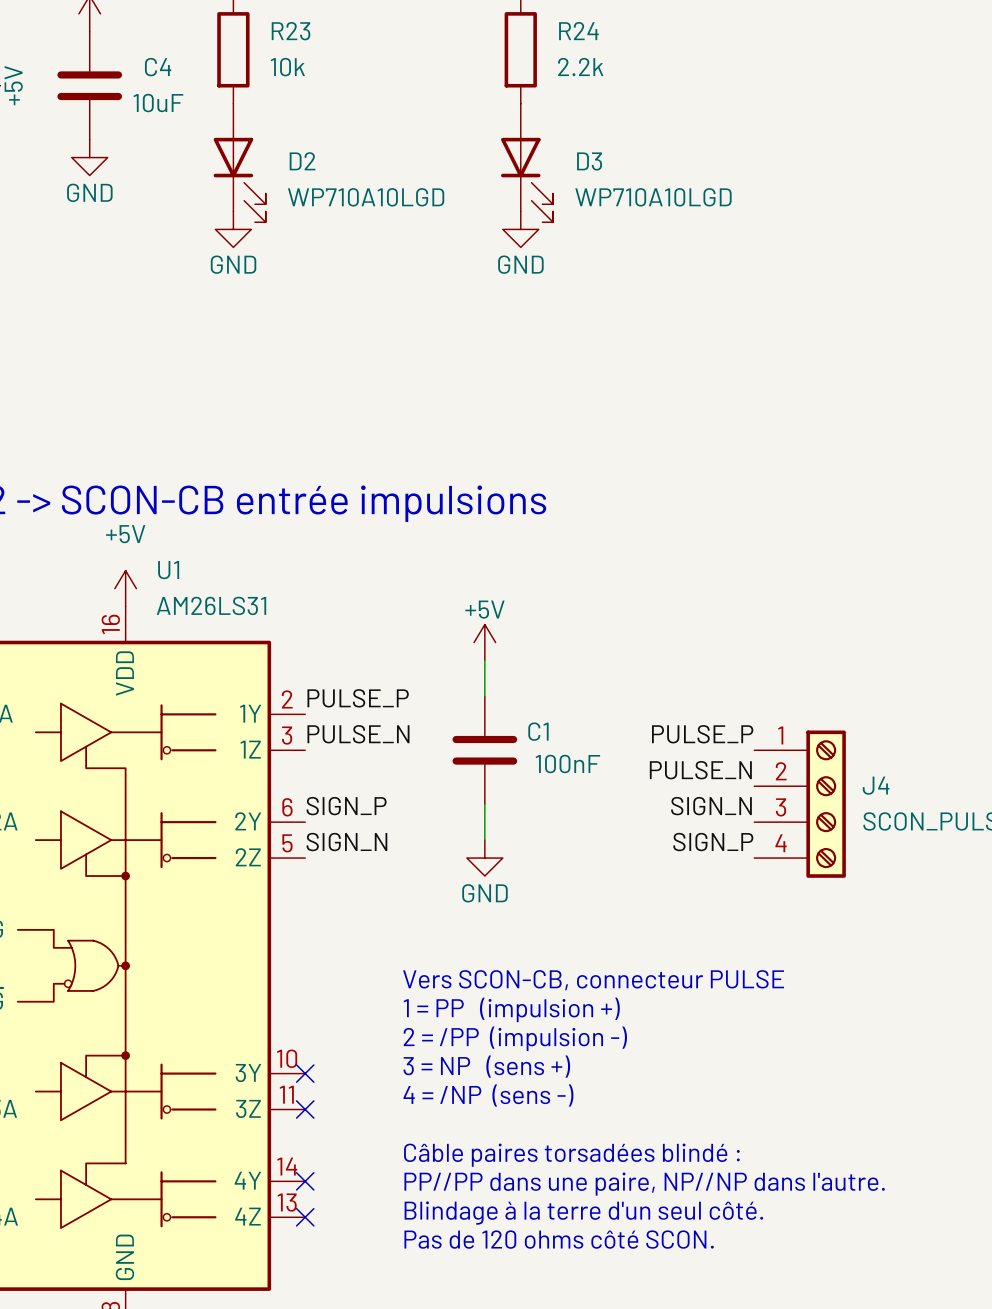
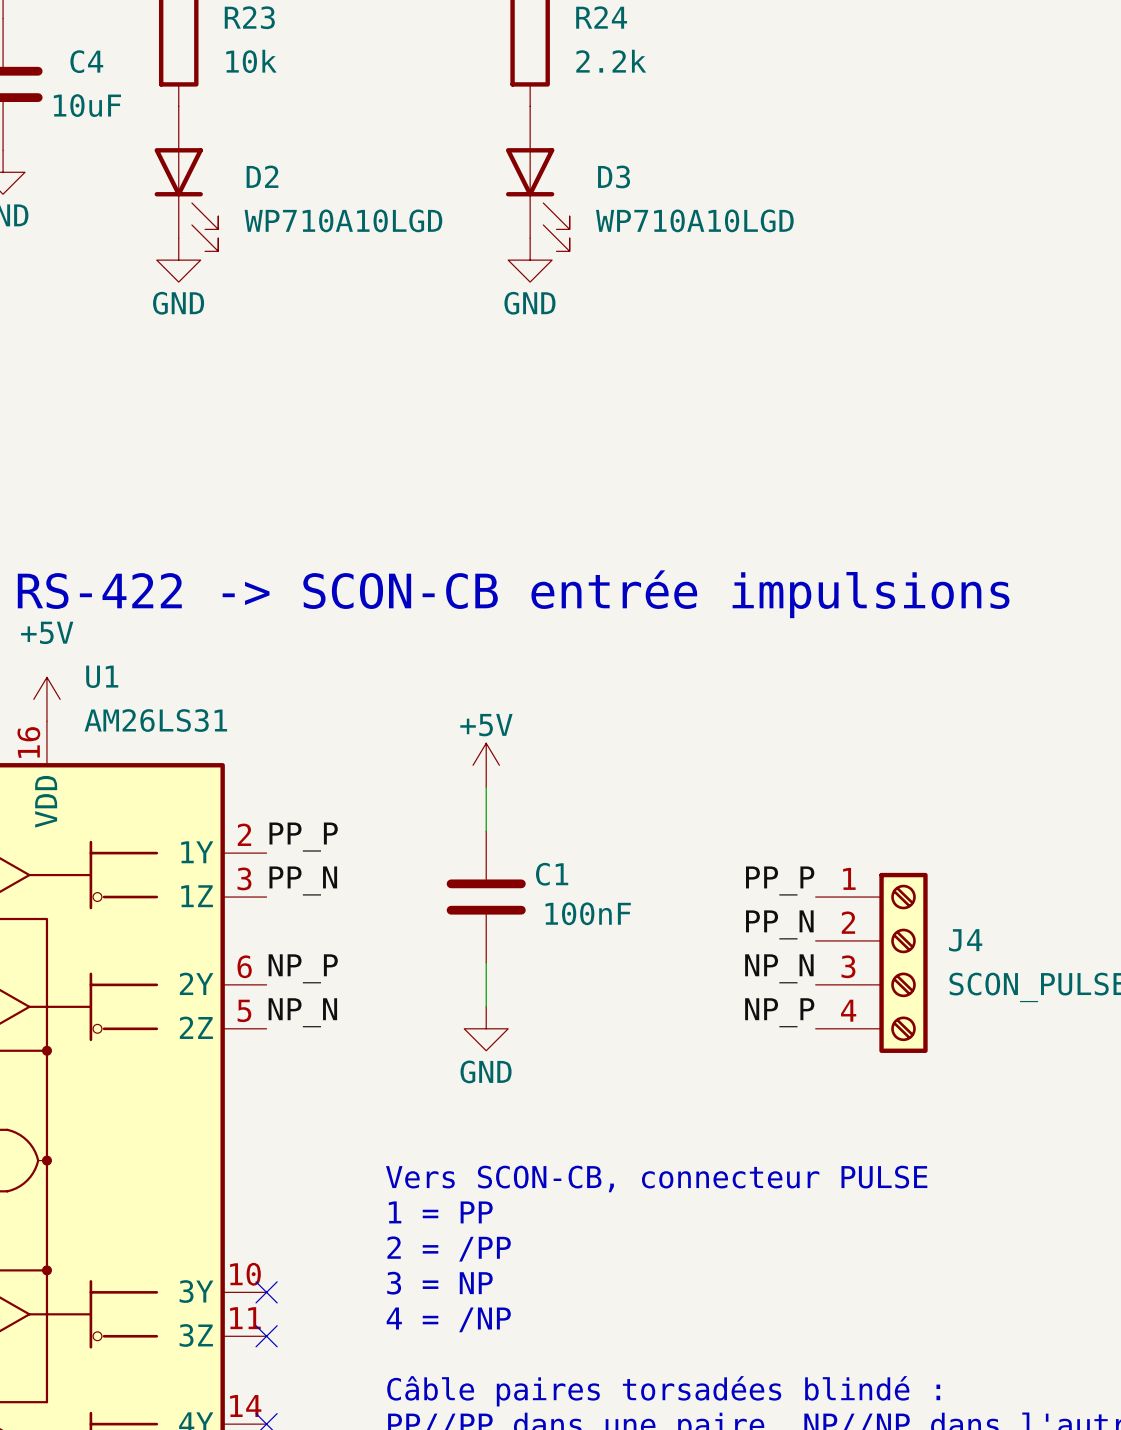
label: PULSE_P (358, 698) -> PP_P (303, 837)
label: PULSE_N (358, 734) -> PP_N (303, 880)
label: PULSE_P (702, 734) -> PP_P (780, 880)
label: PULSE_N (700, 770) -> PP_N (779, 924)
label: SIGN_P (346, 806) -> NP_P (303, 968)
label: SIGN_N (711, 806) -> NP_N (779, 968)
label: SIGN_N (346, 842) -> NP_N (302, 1012)
label: SIGN_P (713, 842) -> NP_P (779, 1012)
text: 1 = PP (impulsion +) (511, 1009) -> 1 = PP (440, 1212)
text: 2 = /PP (impulsion -) (515, 1038) -> 2 = /PP (449, 1248)
text: 3 = NP (sens +) (486, 1066) -> 3 = NP (439, 1283)
text: 4 = /NP (sens -) (488, 1095) -> 4 = /NP (448, 1319)

